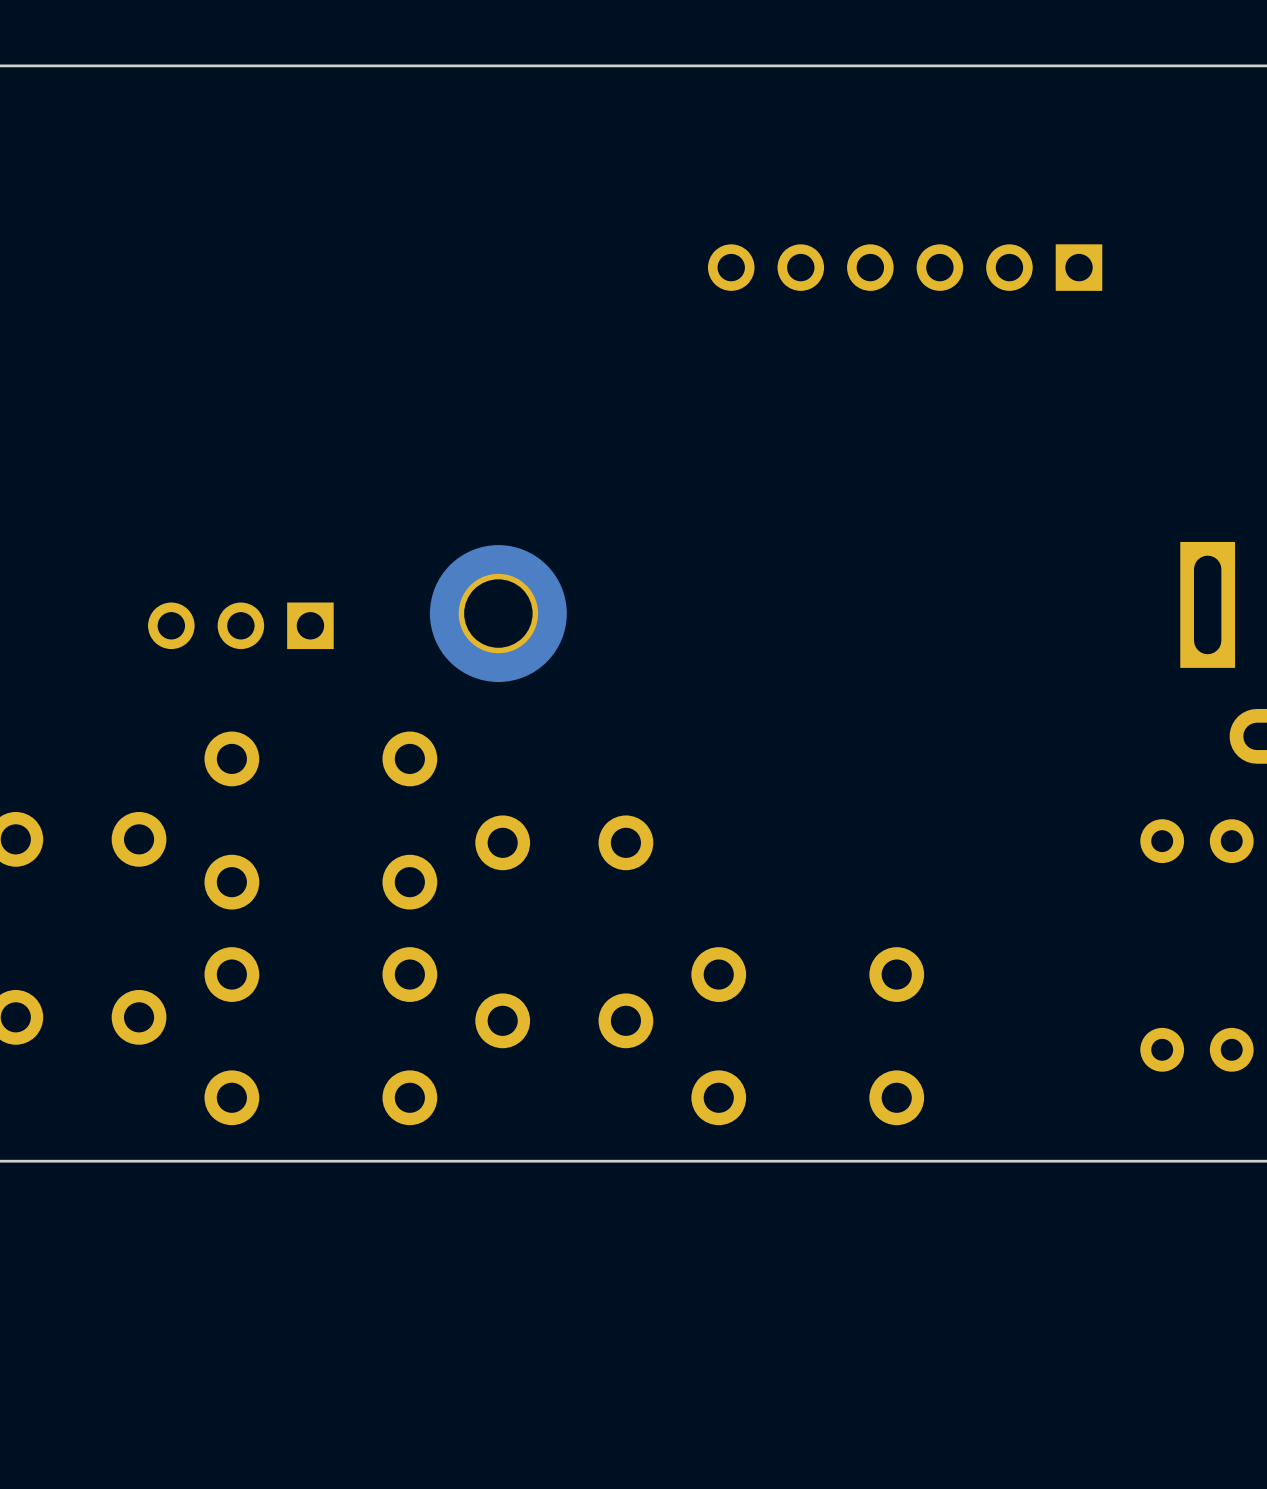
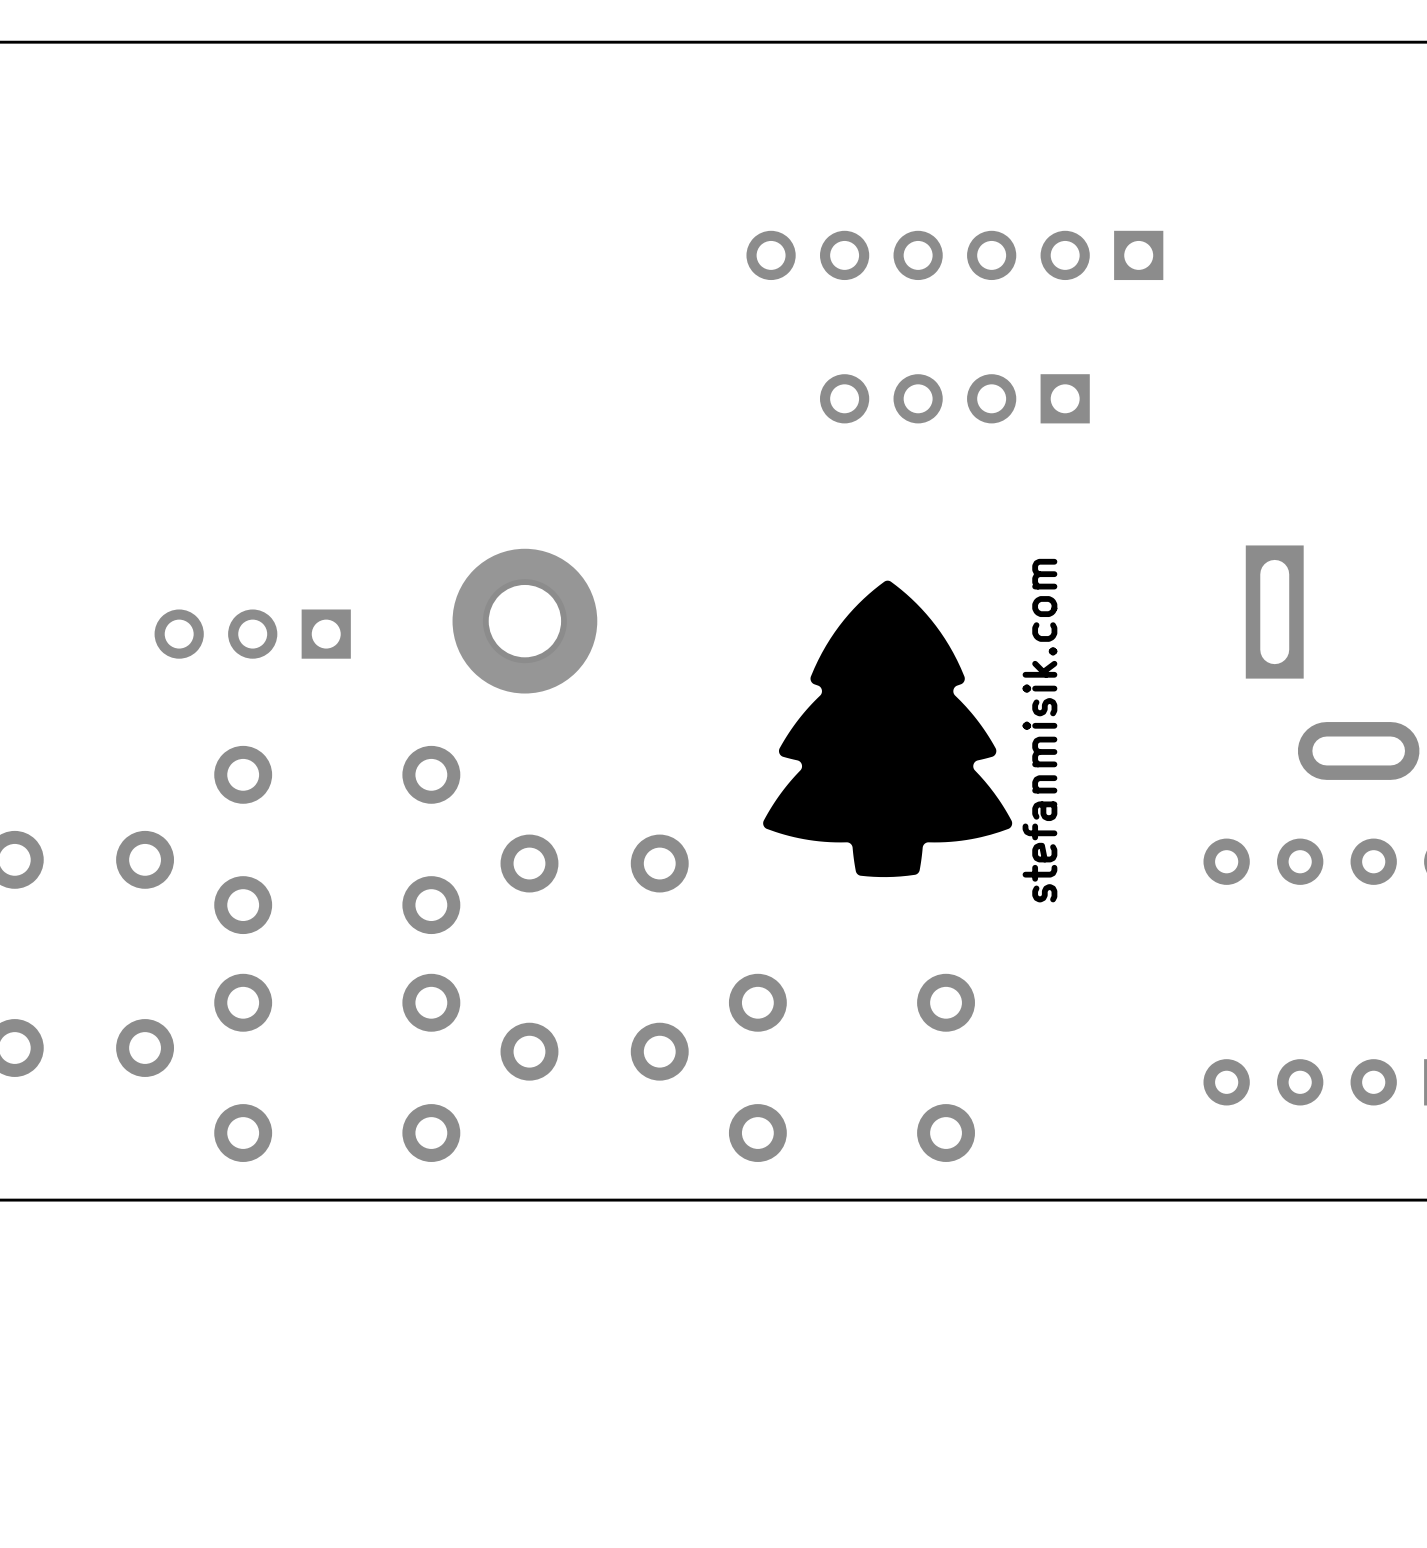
part: none -> (954, 398)
drawing: none -> [763, 580, 1013, 878]
text: none -> stefanmisik.com (1039, 730)

